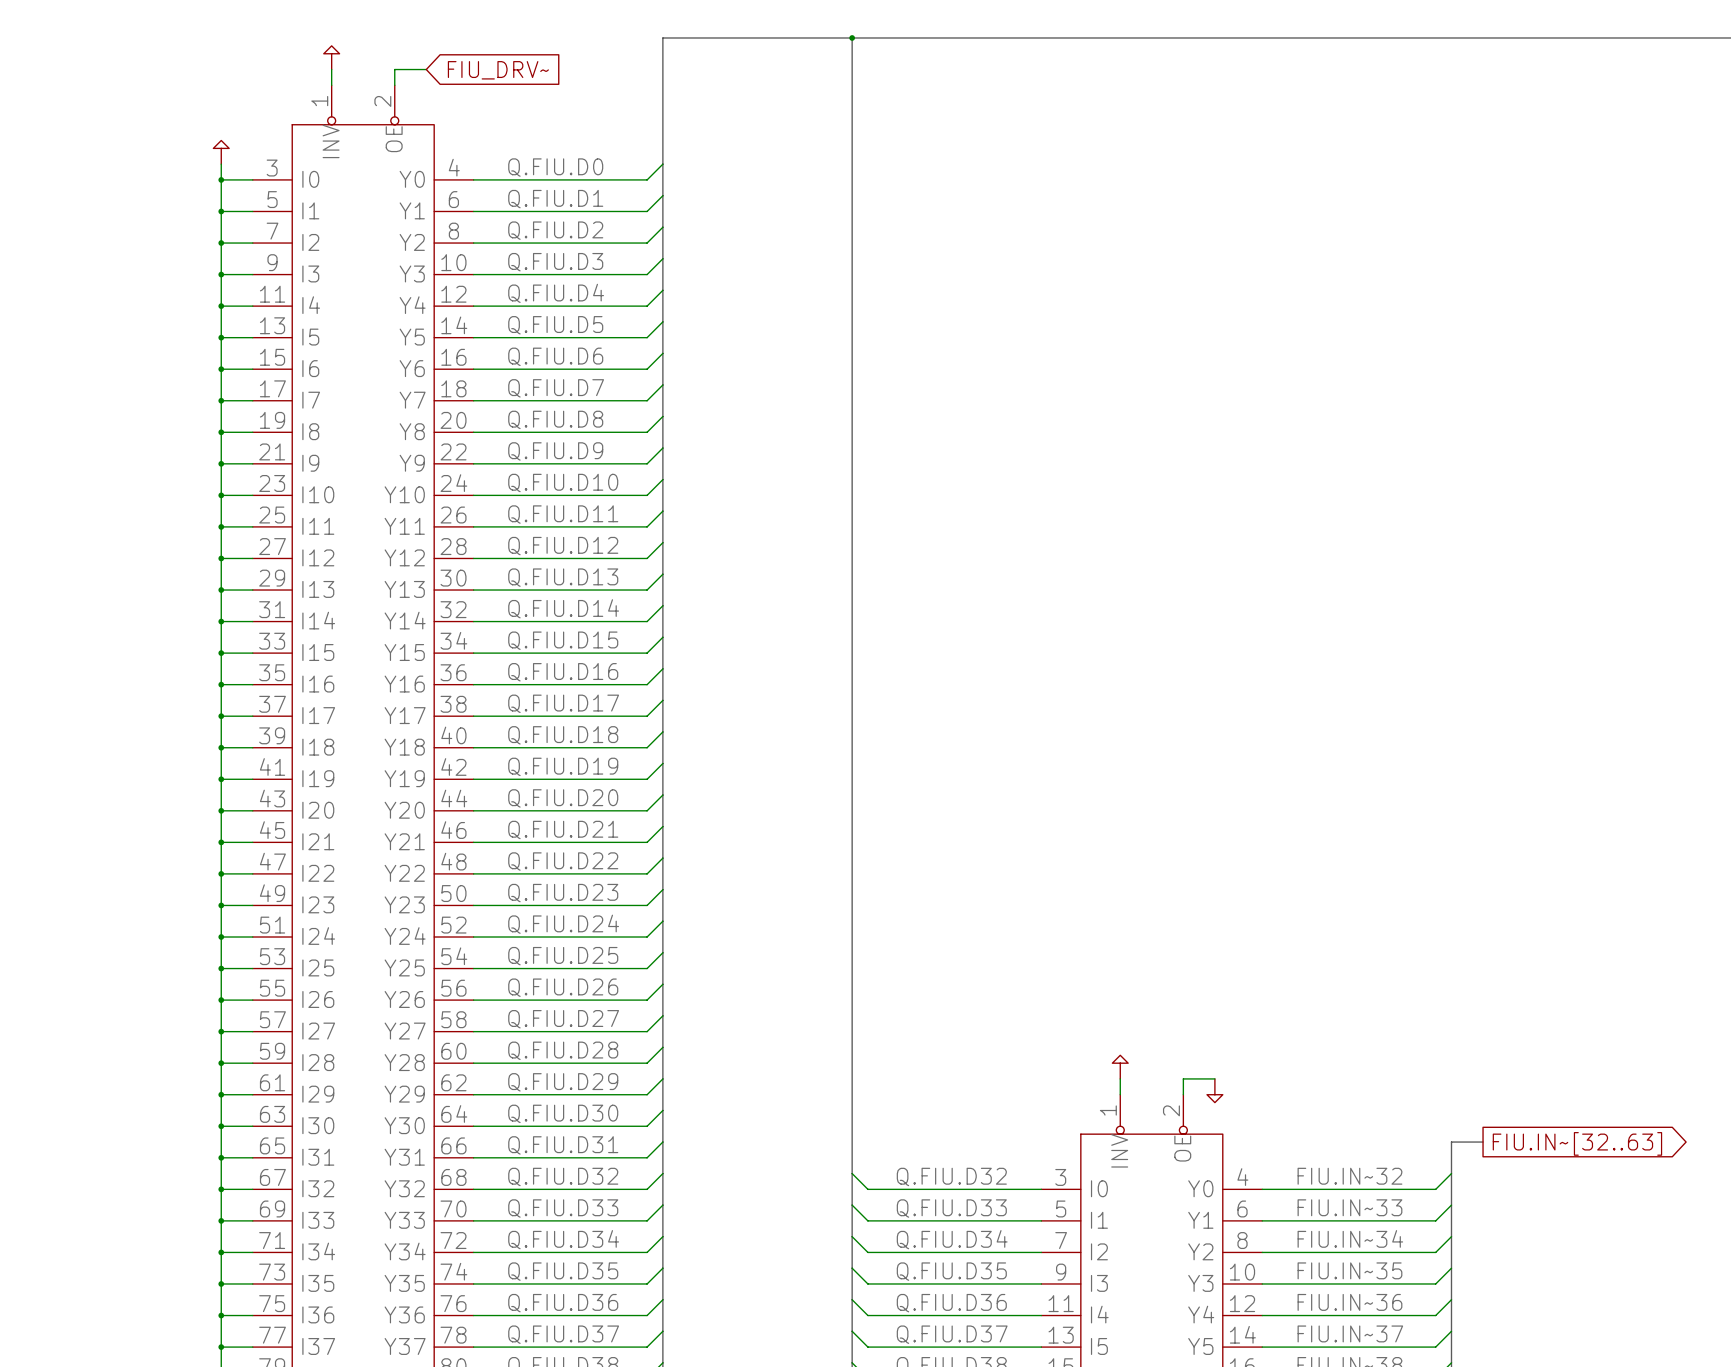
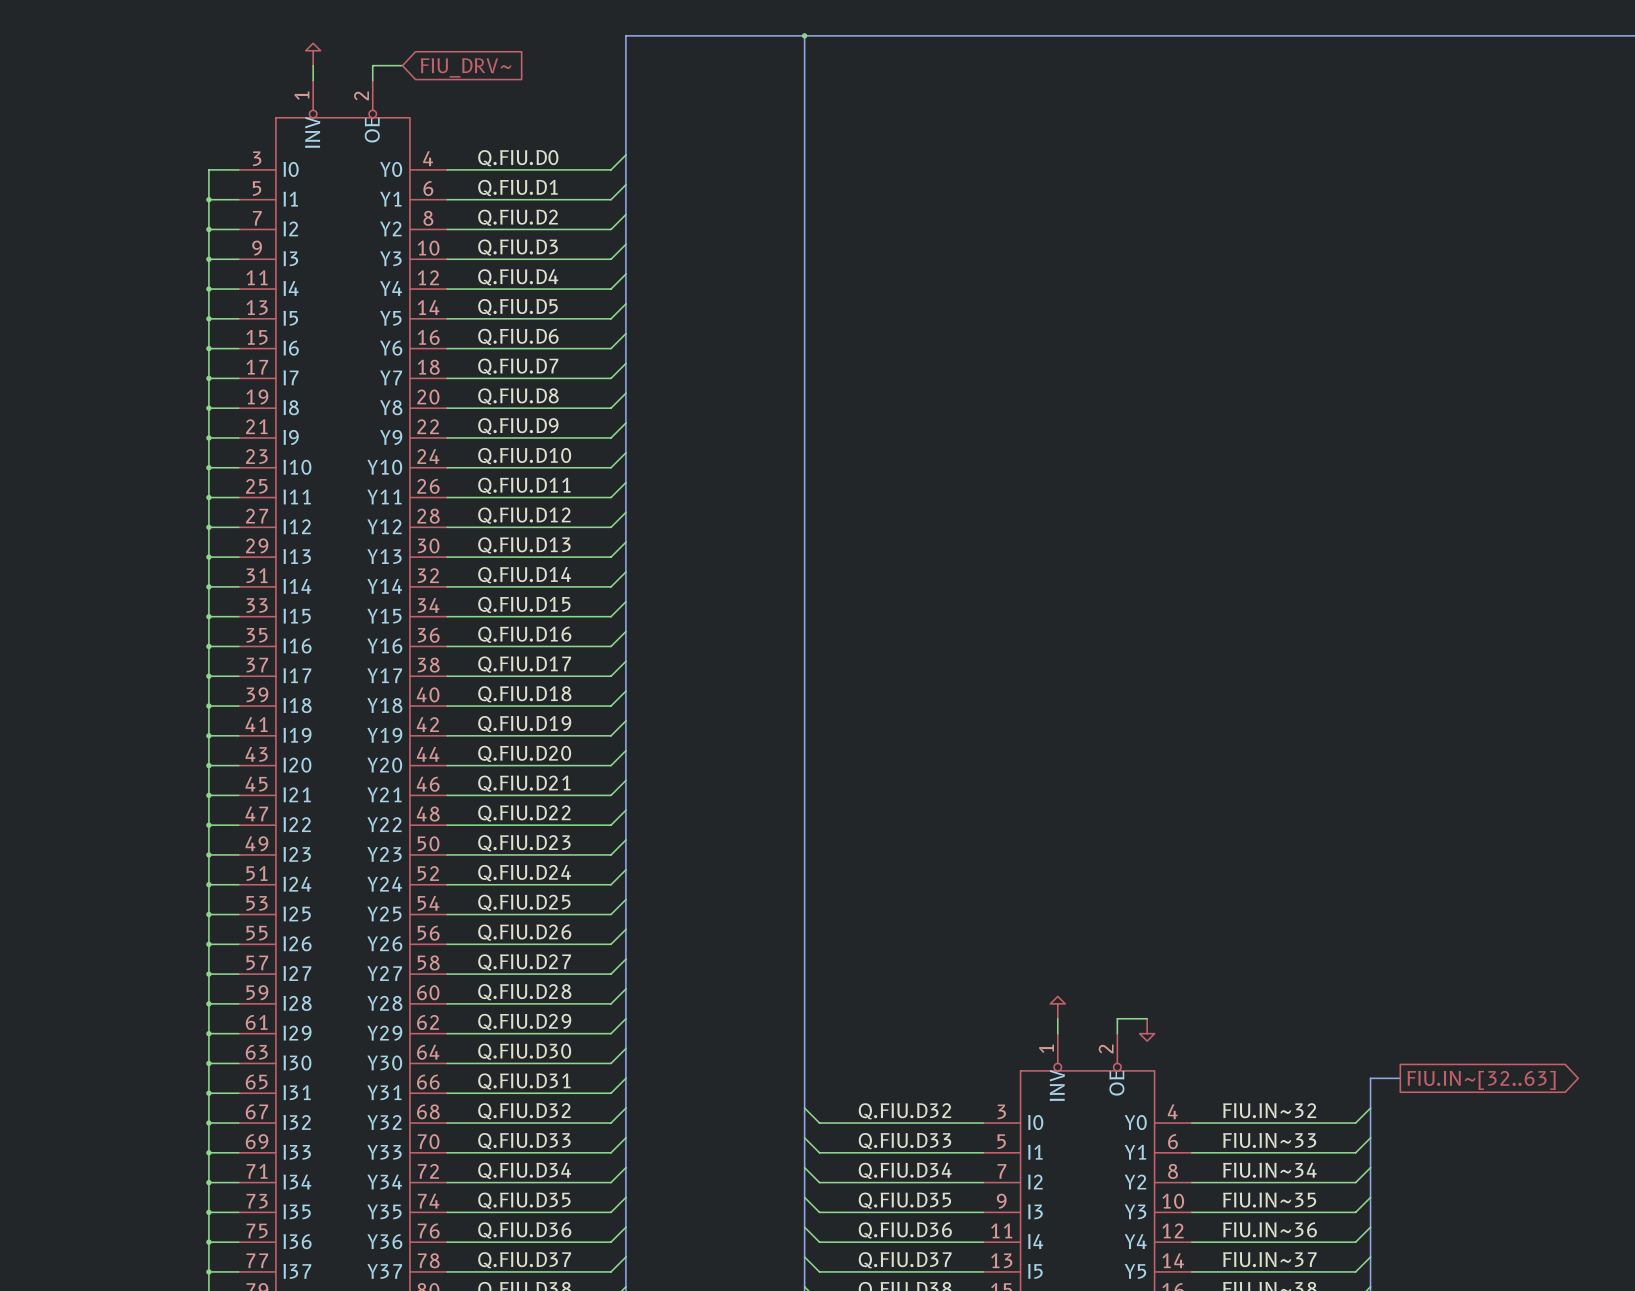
power symbol: (221, 152) -> none
wire: (221, 164) (221, 179) -> none
junction: (221, 179) -> none

